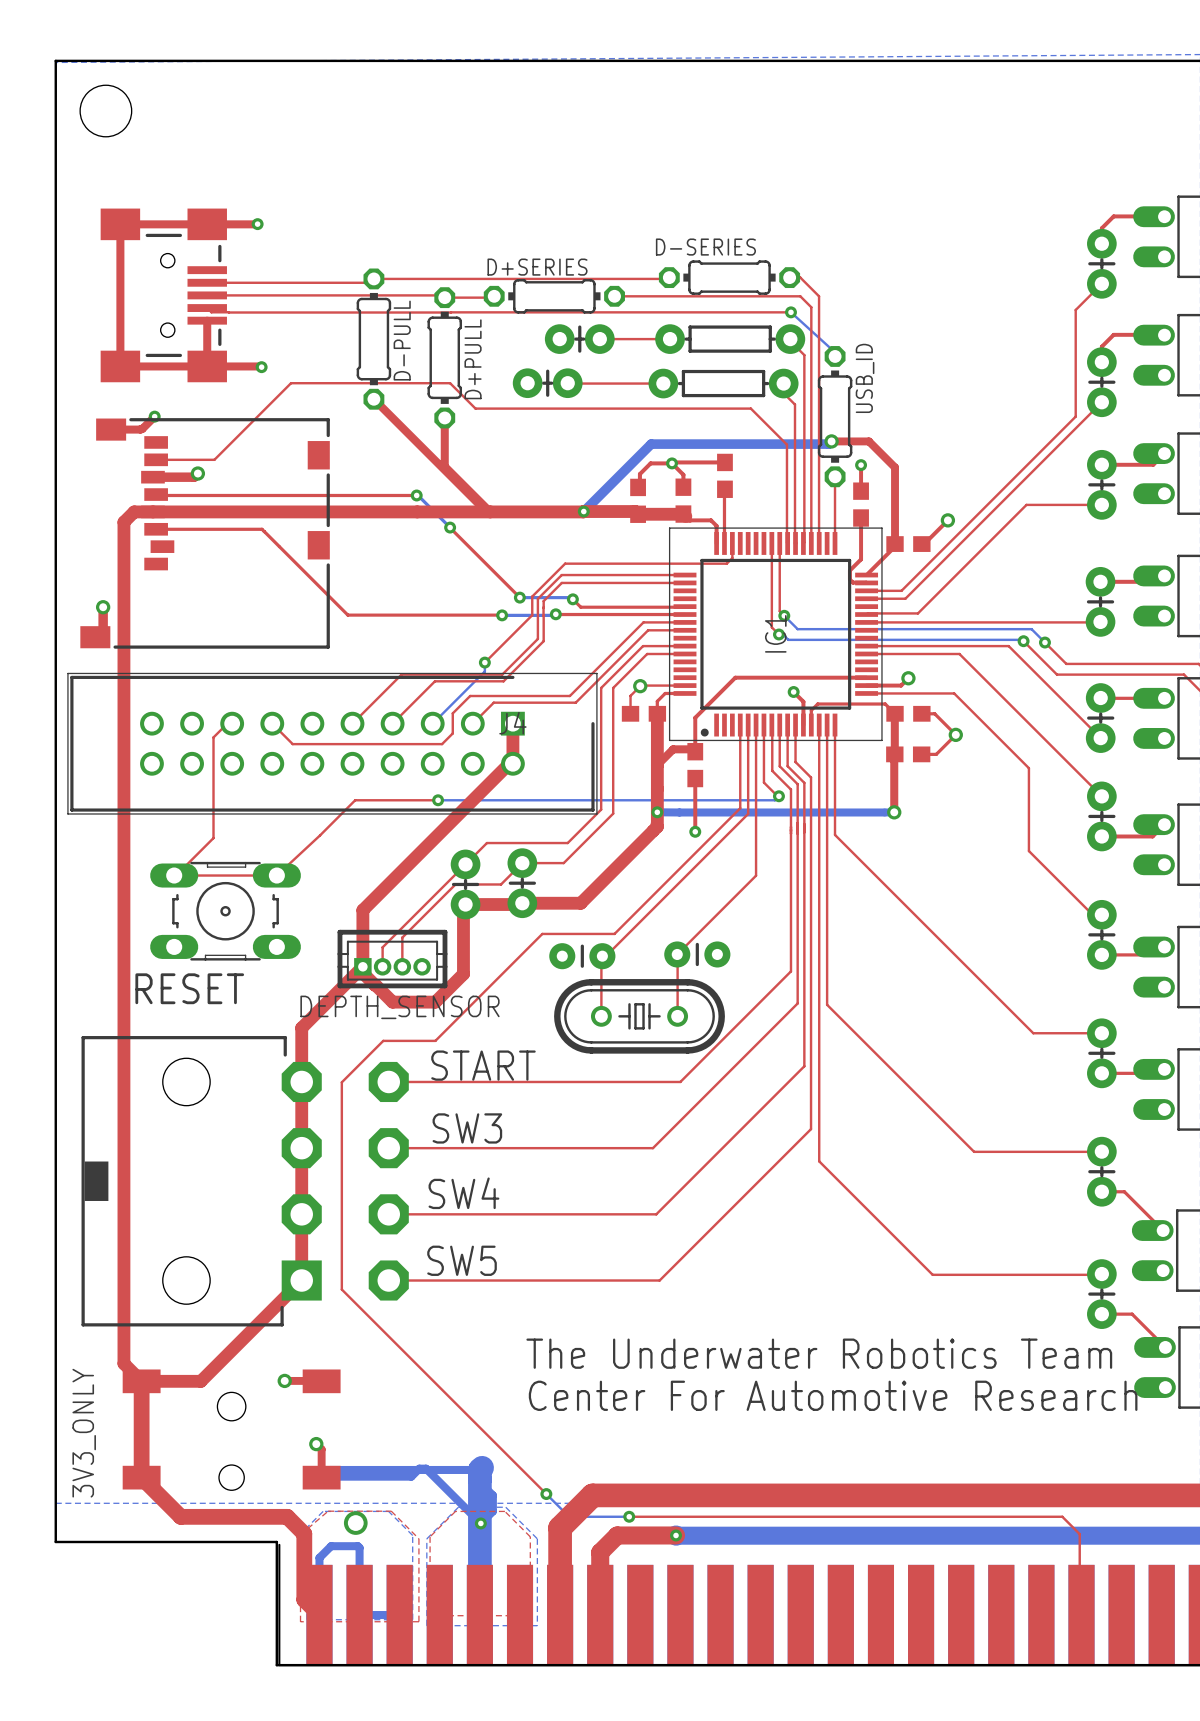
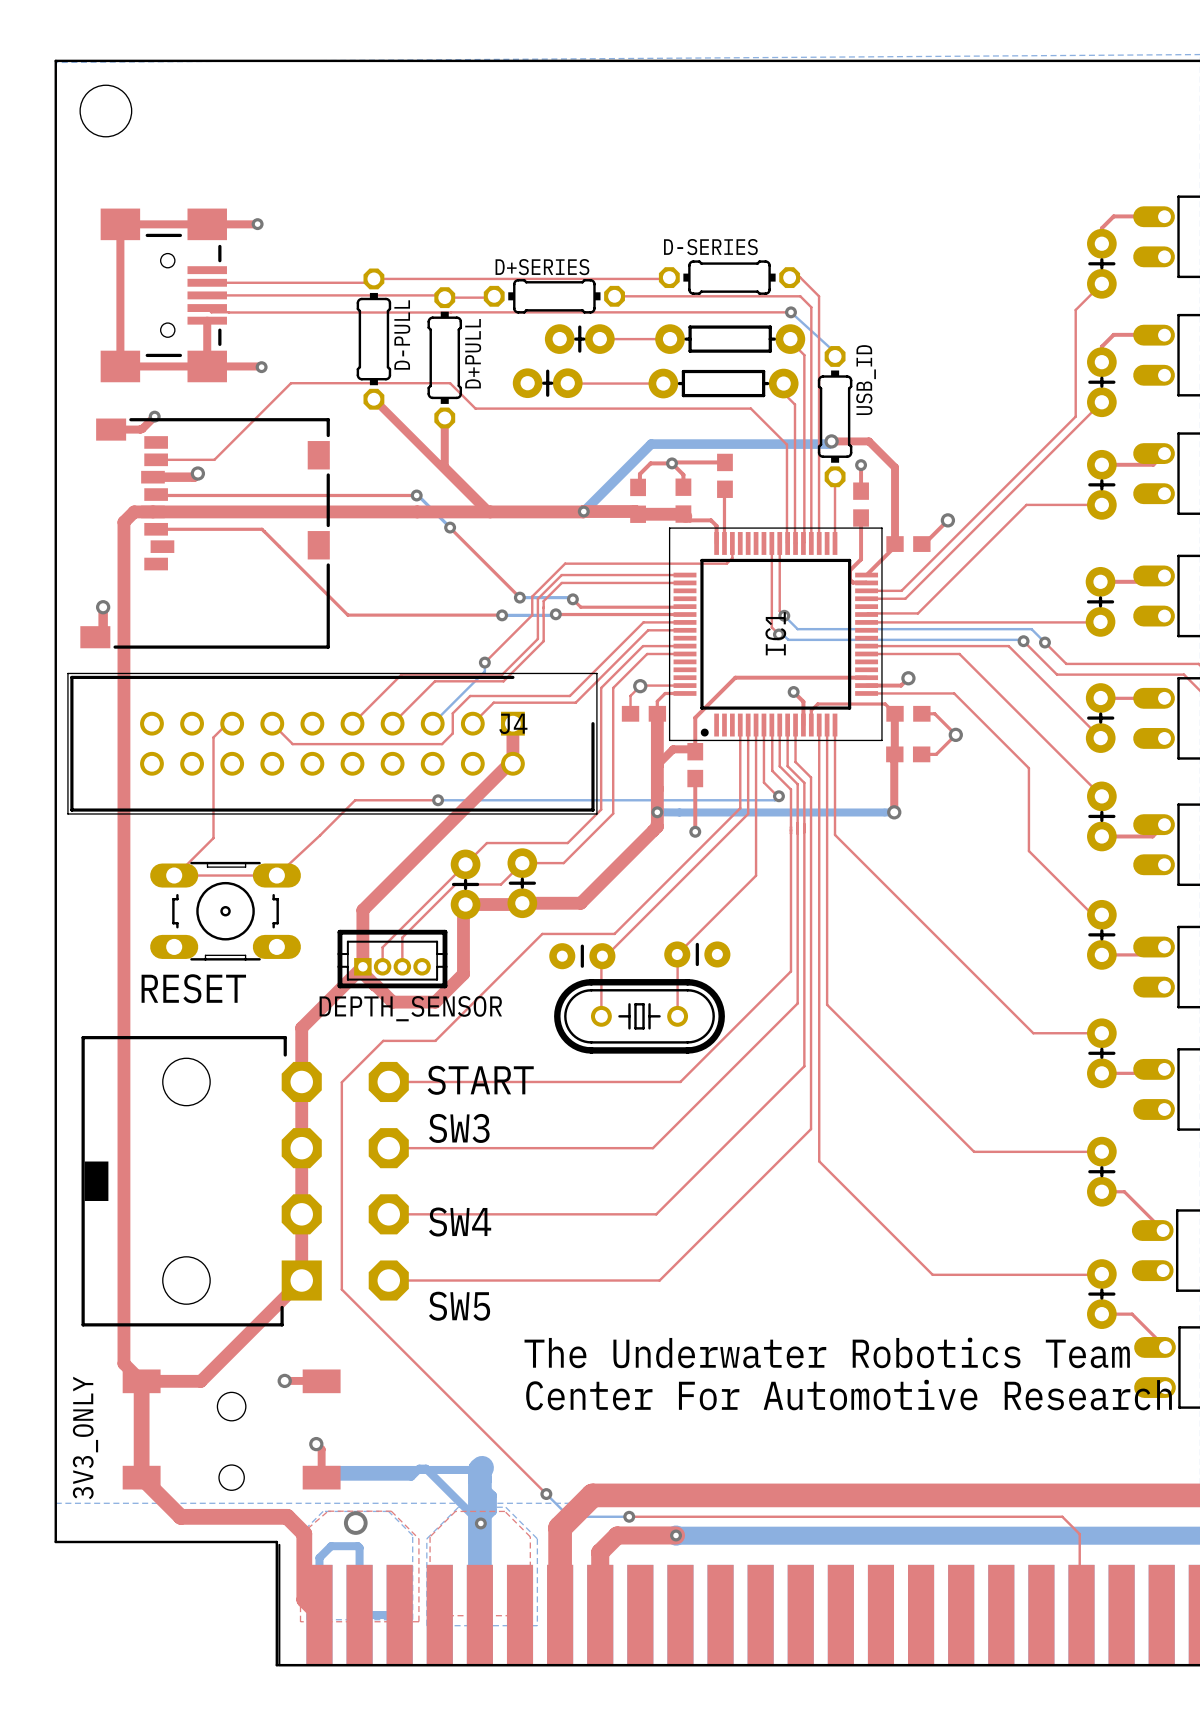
text position: START (483, 1065) -> START (480, 1080)
text position: SW4 (463, 1193) -> SW4 (460, 1222)
text position: SW5 (462, 1260) -> SW5 (459, 1306)

